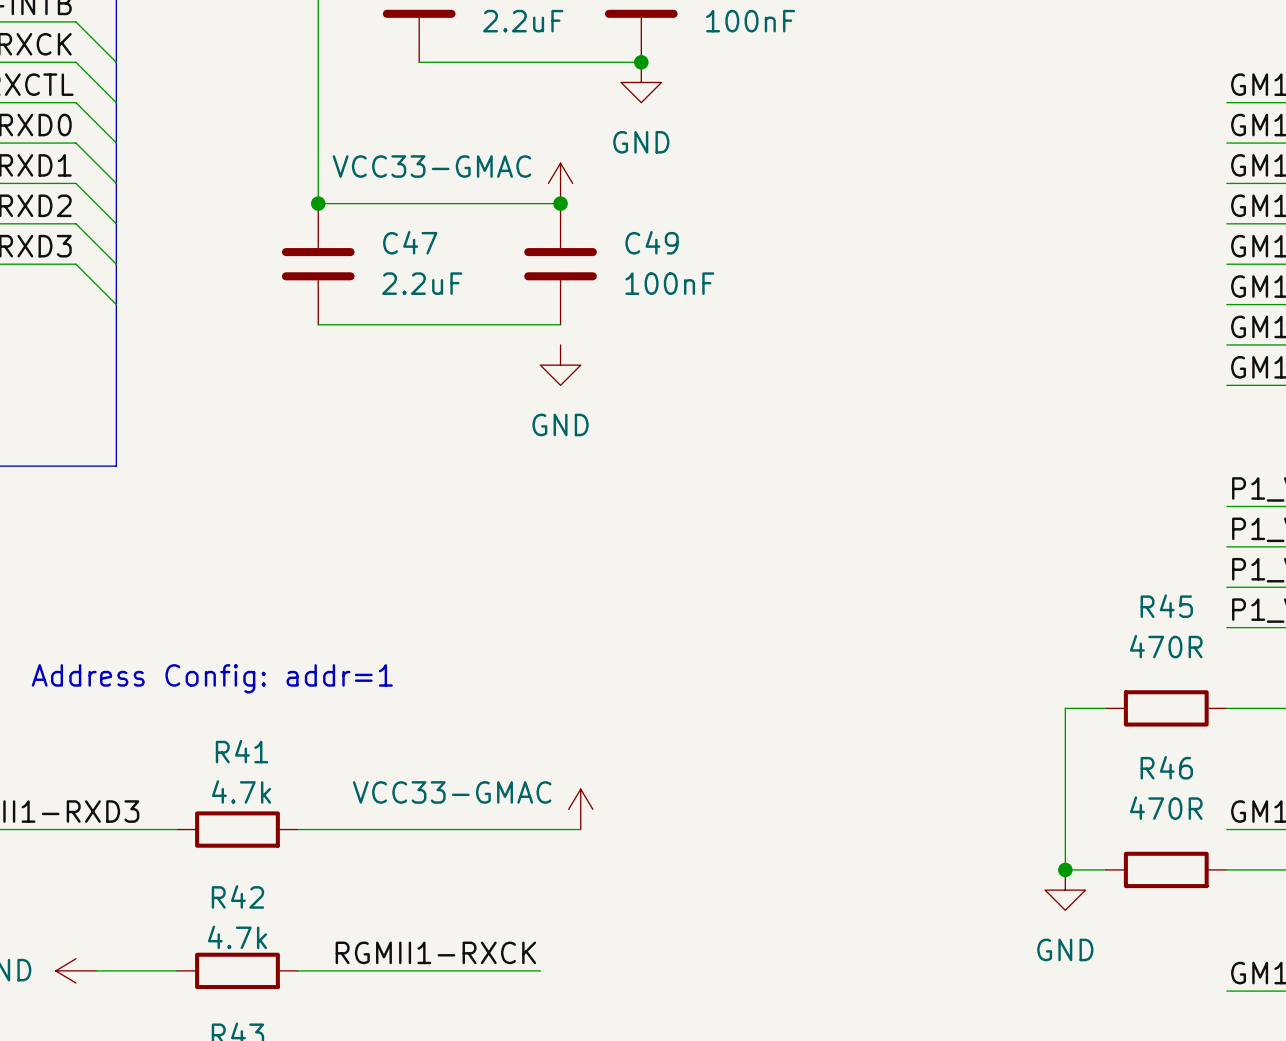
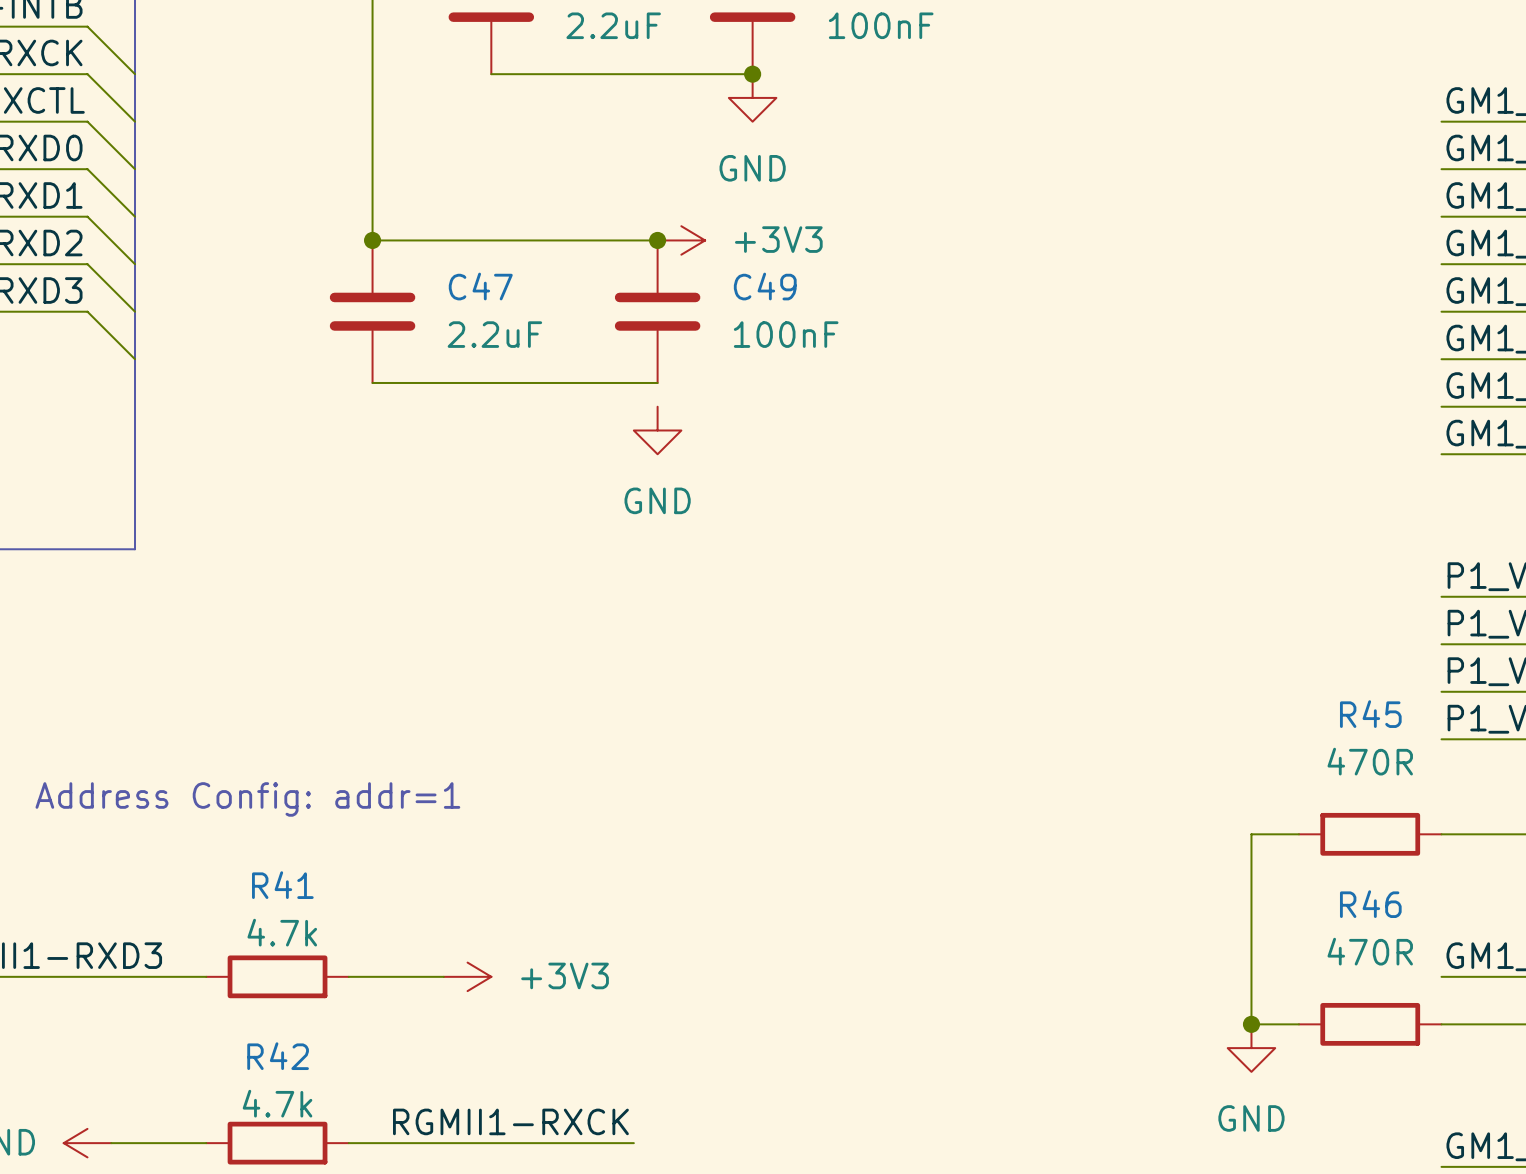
power symbol: VCC33-GMAC (560, 183) -> none
power symbol: none -> +3V3 (681, 240)
power symbol: VCC33-GMAC (580, 809) -> none
wire: (378, 829) (580, 829) -> none
power symbol: none -> +3V3 (467, 976)

